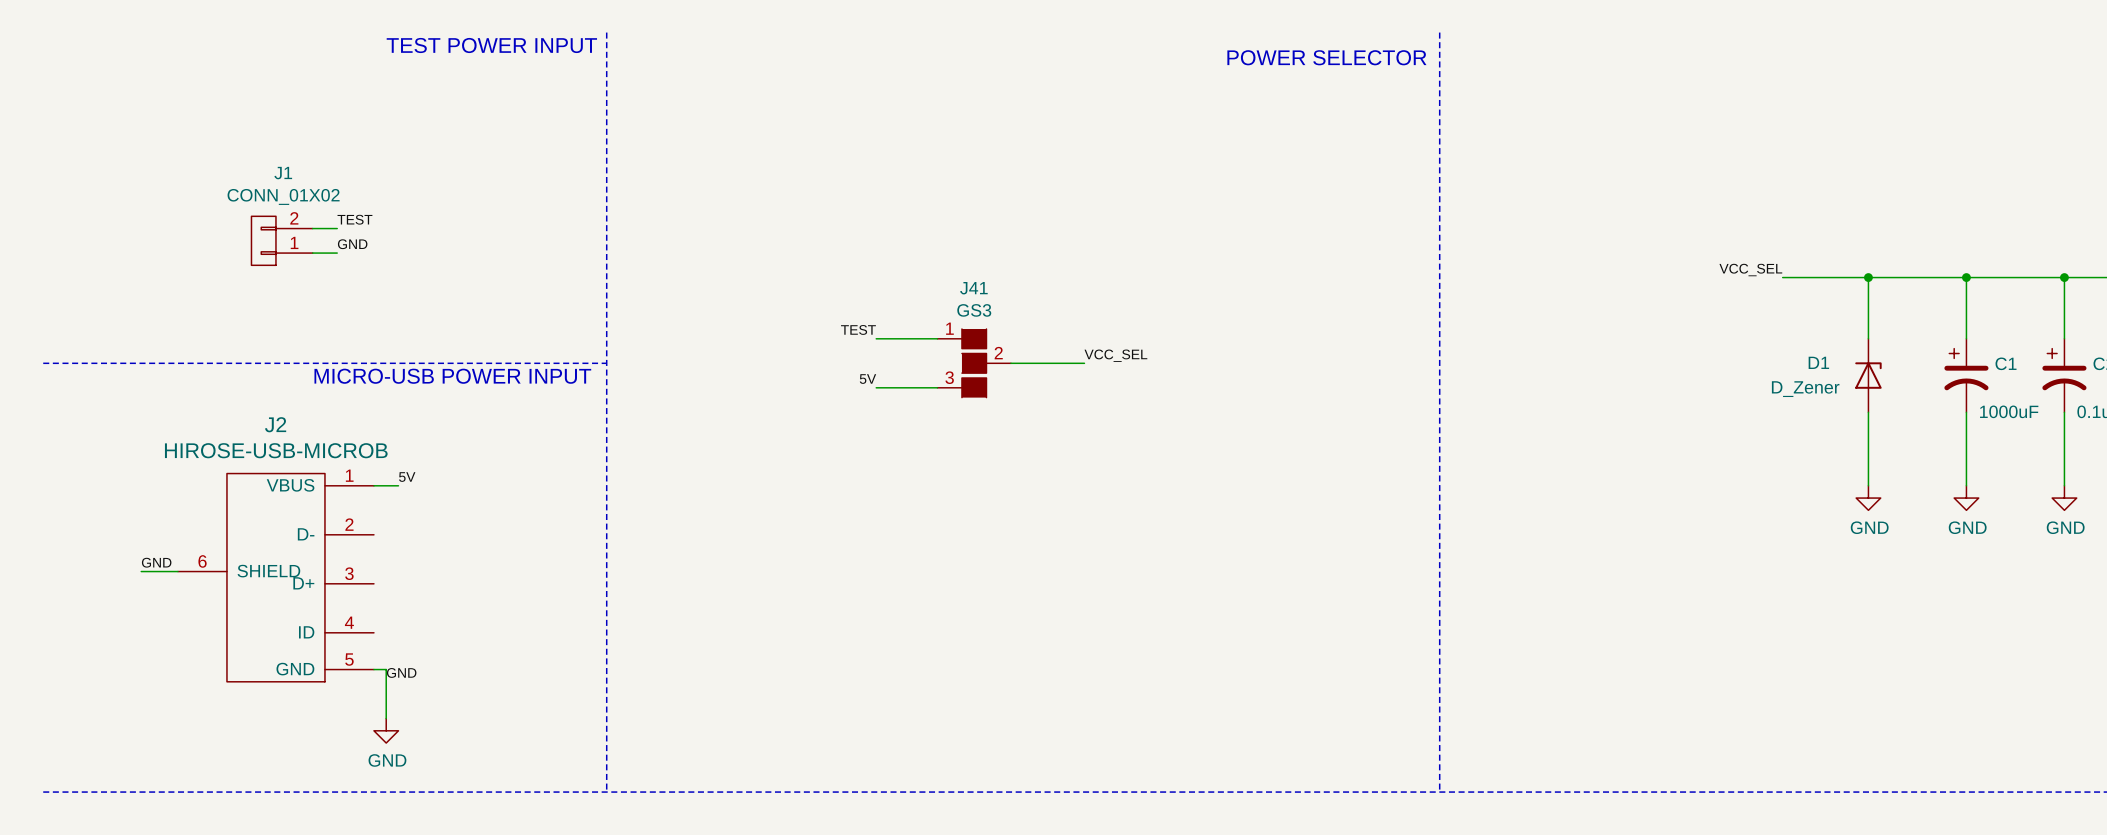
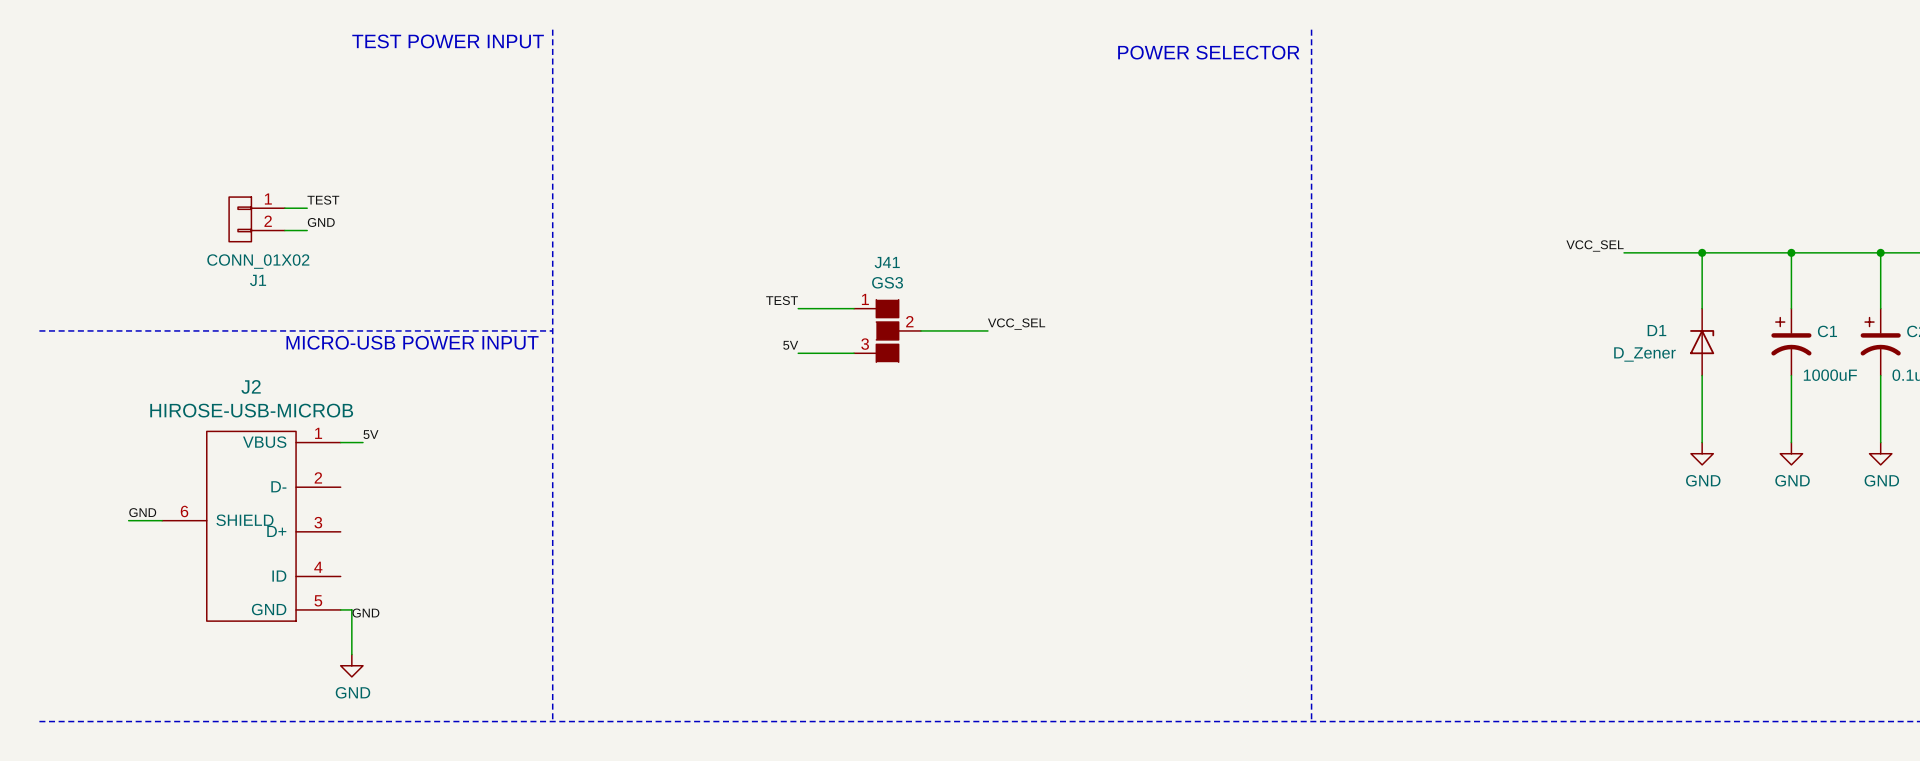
J1 flip: as is (263, 240) -> up-down (240, 219)

